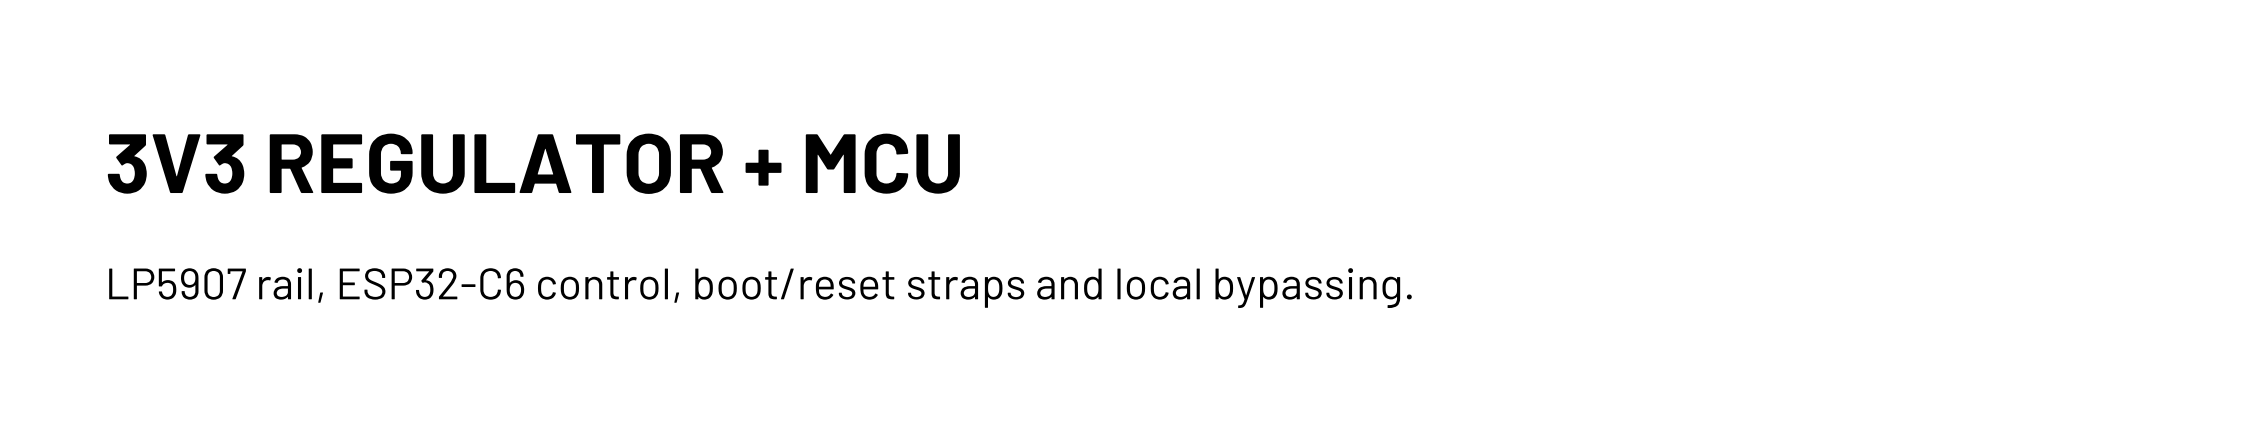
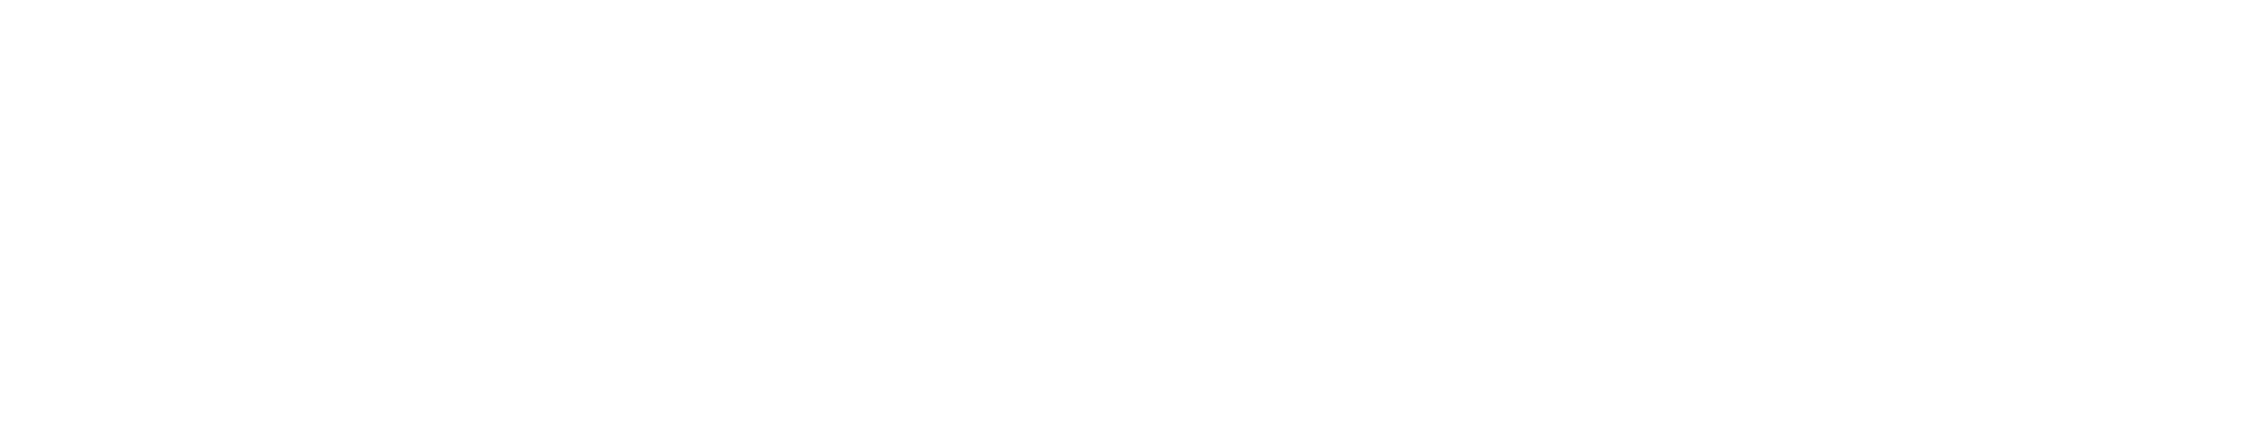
text: 3V3 REGULATOR + MCU (533, 163) -> none
text: LP5907 rail, ESP32-C6 control, boot/reset straps and local bypassing. (760, 288) -> none

